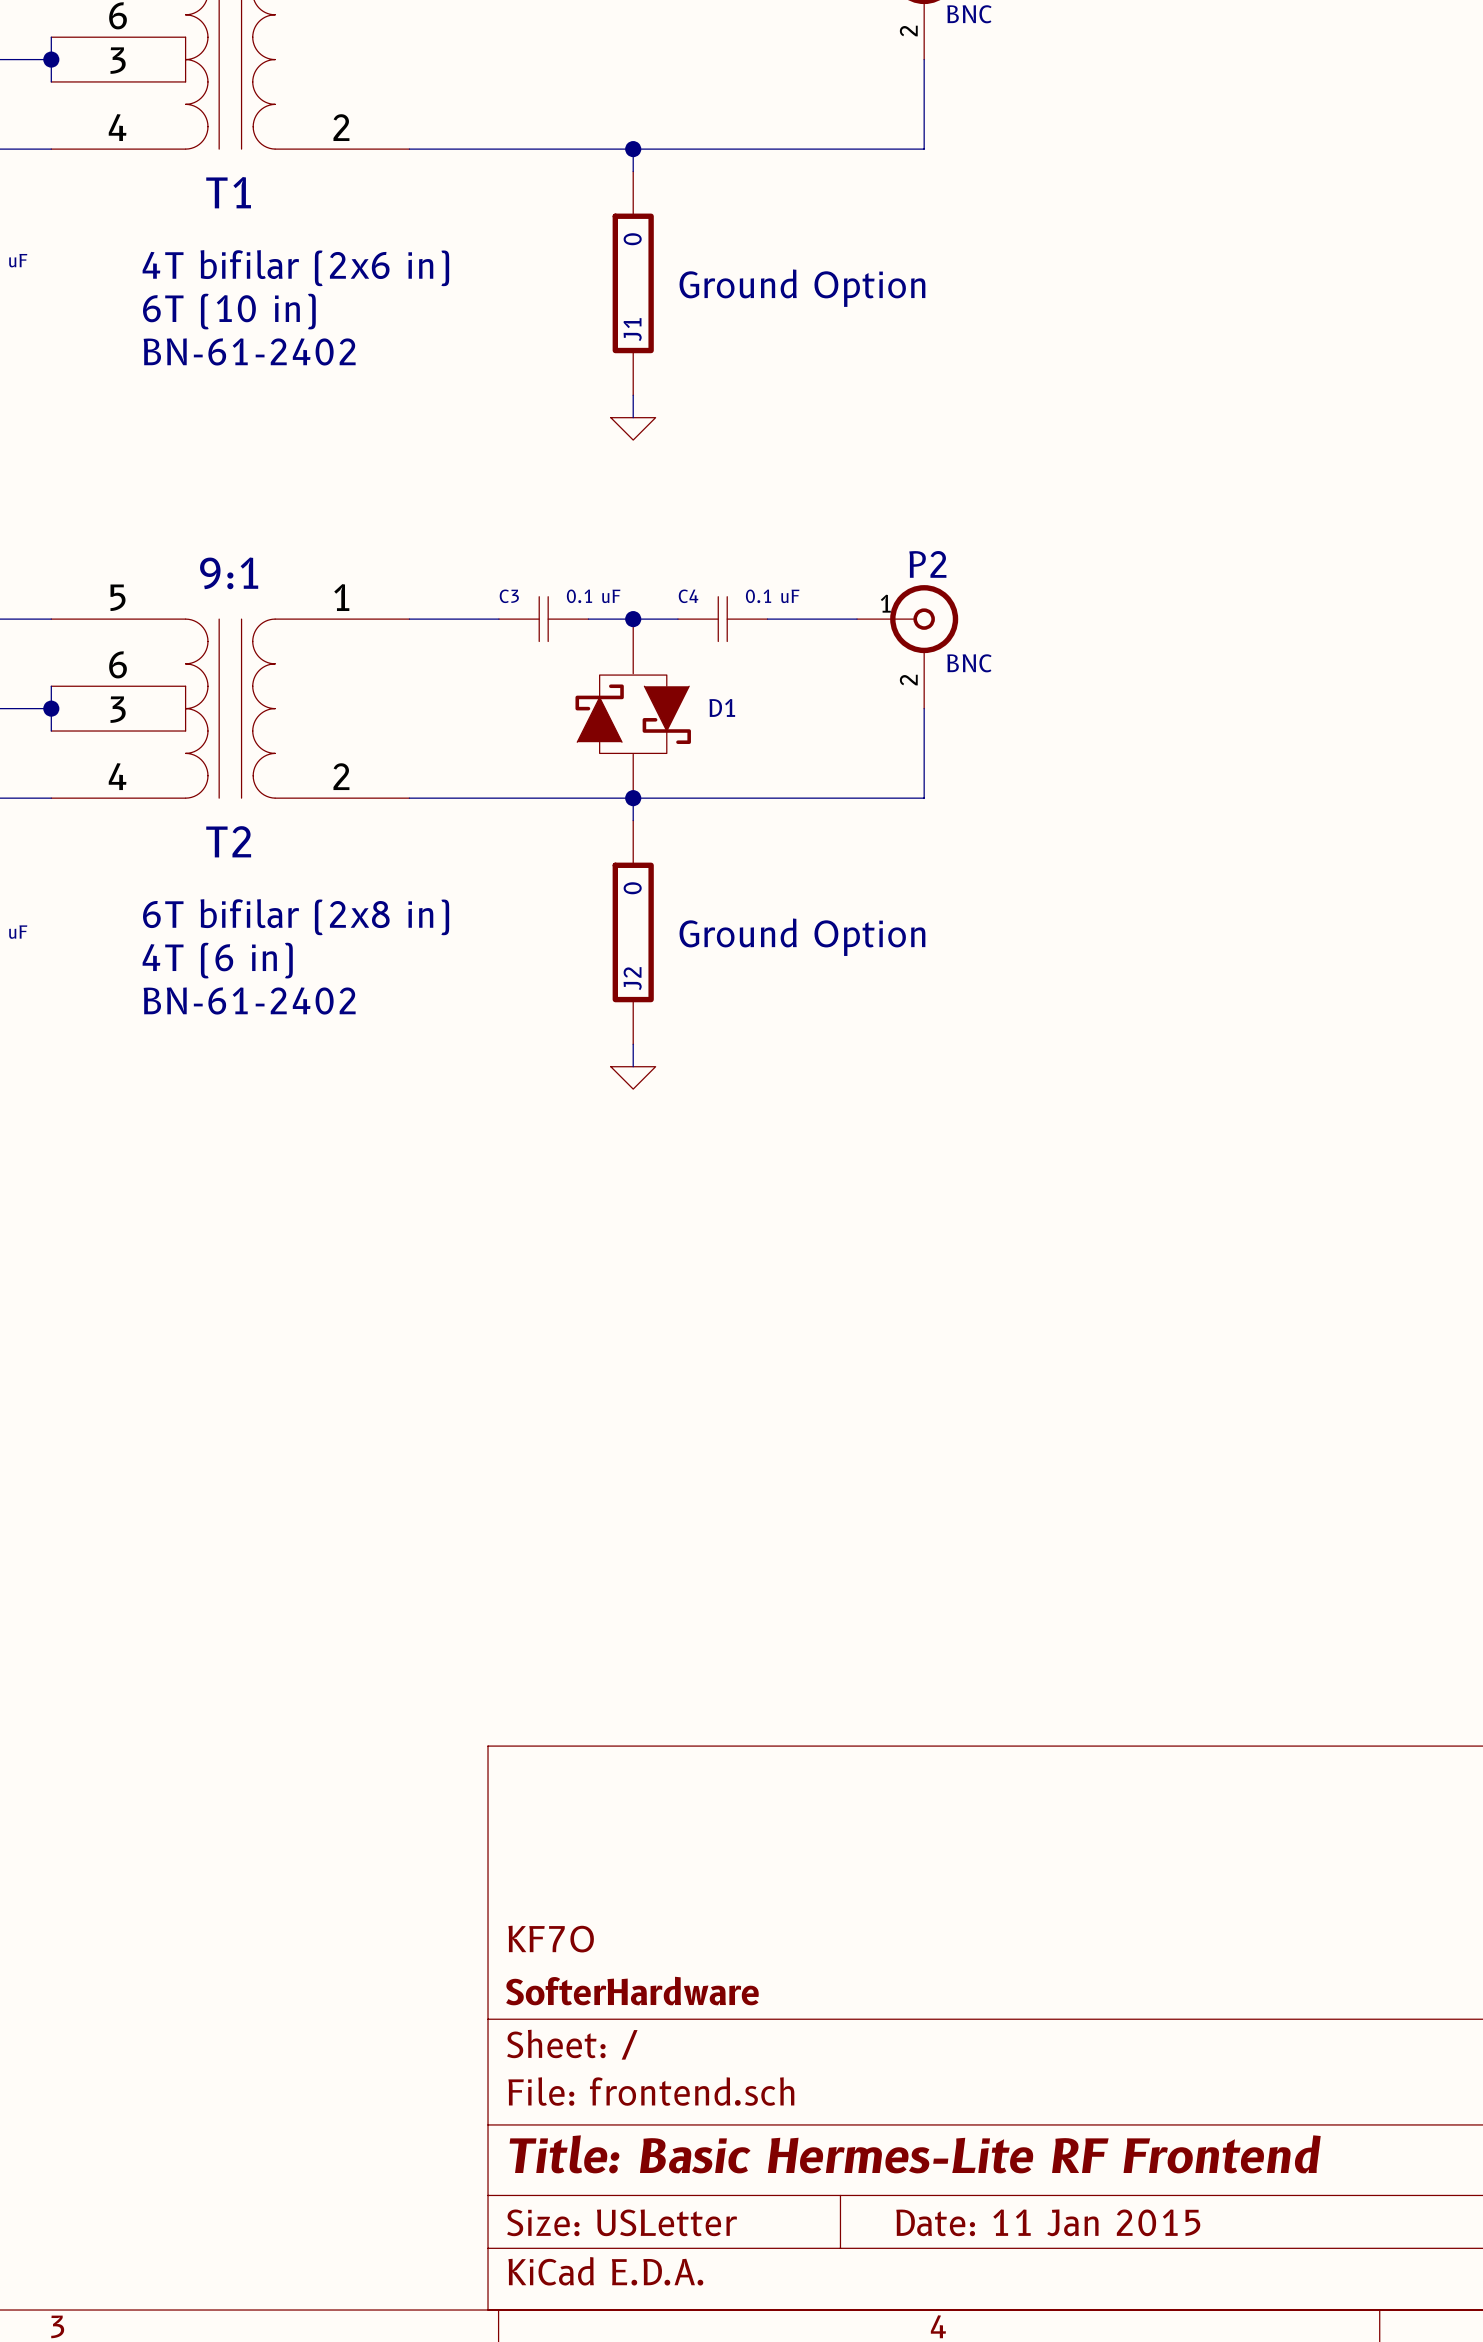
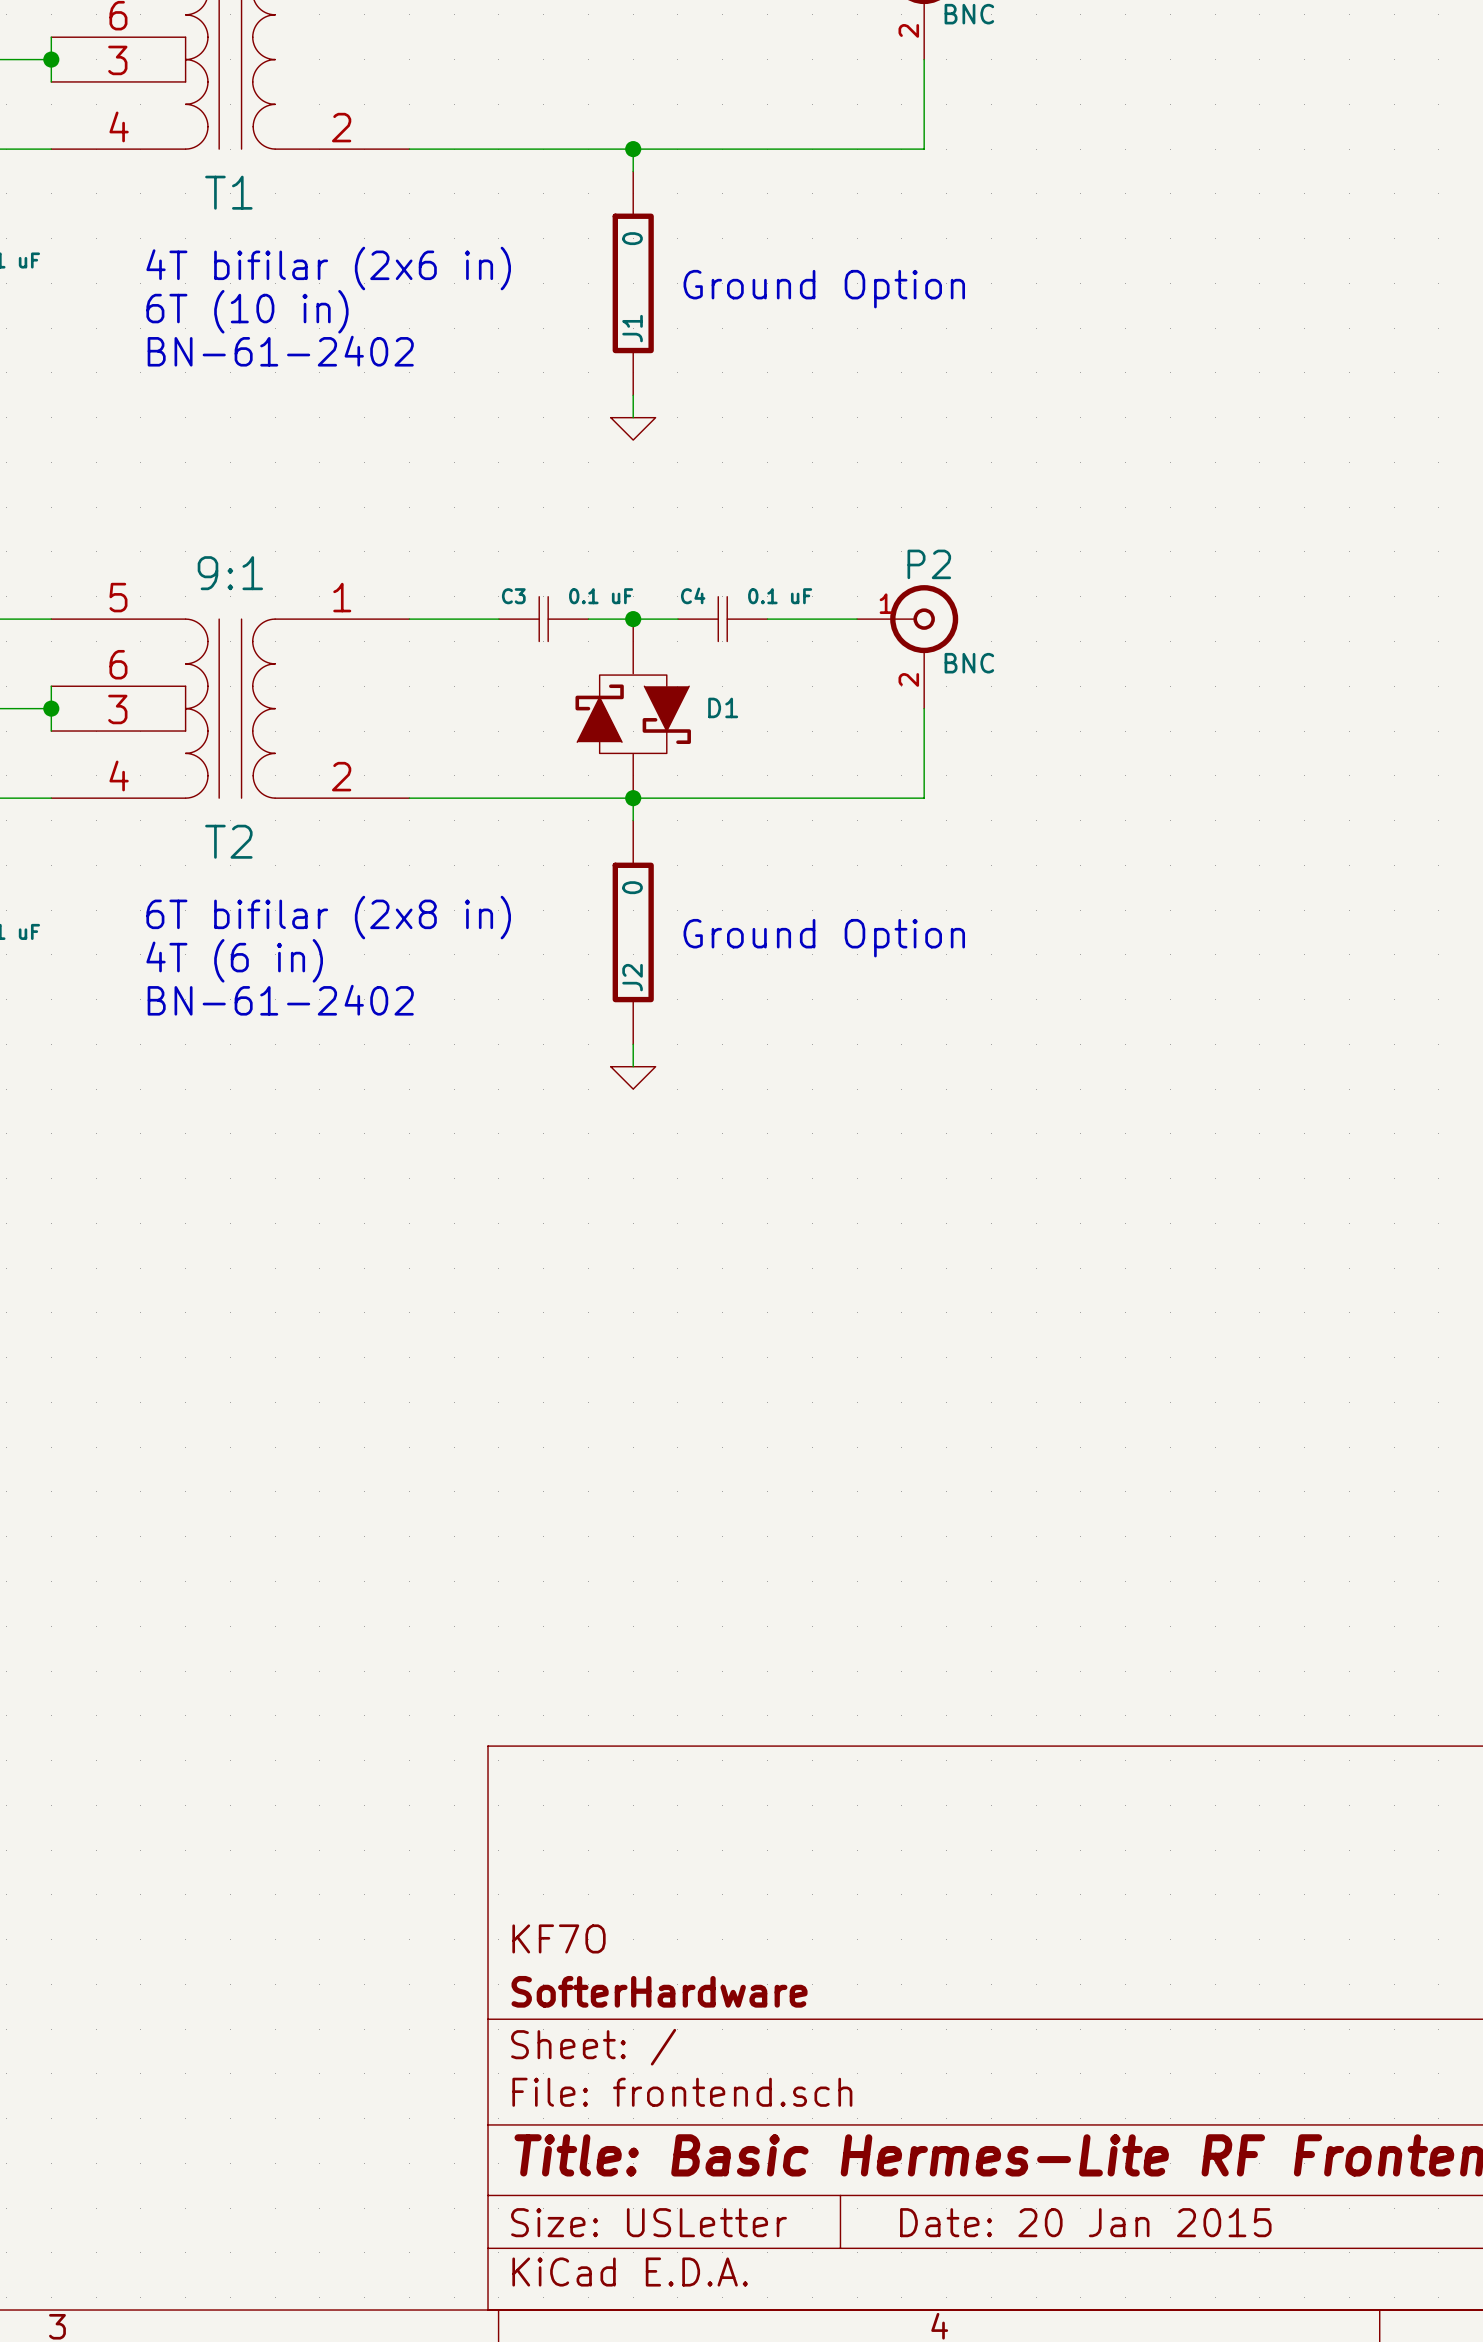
title block: Date: 11 Jan 2015 (1048, 2222) -> Date: 20 Jan 2015 (1085, 2222)

